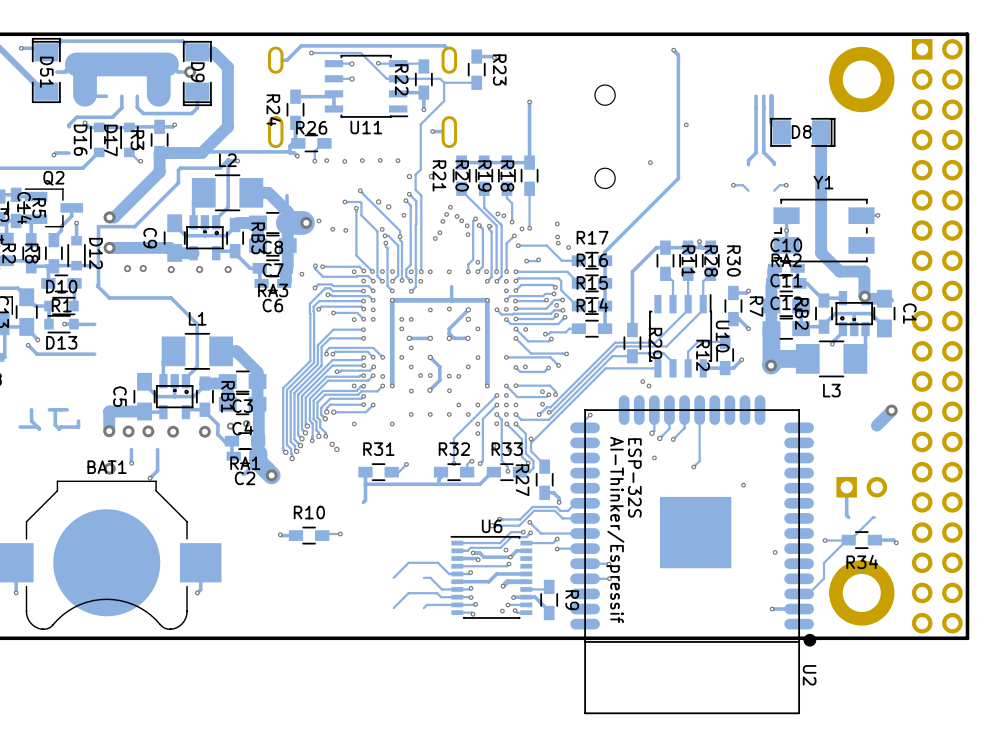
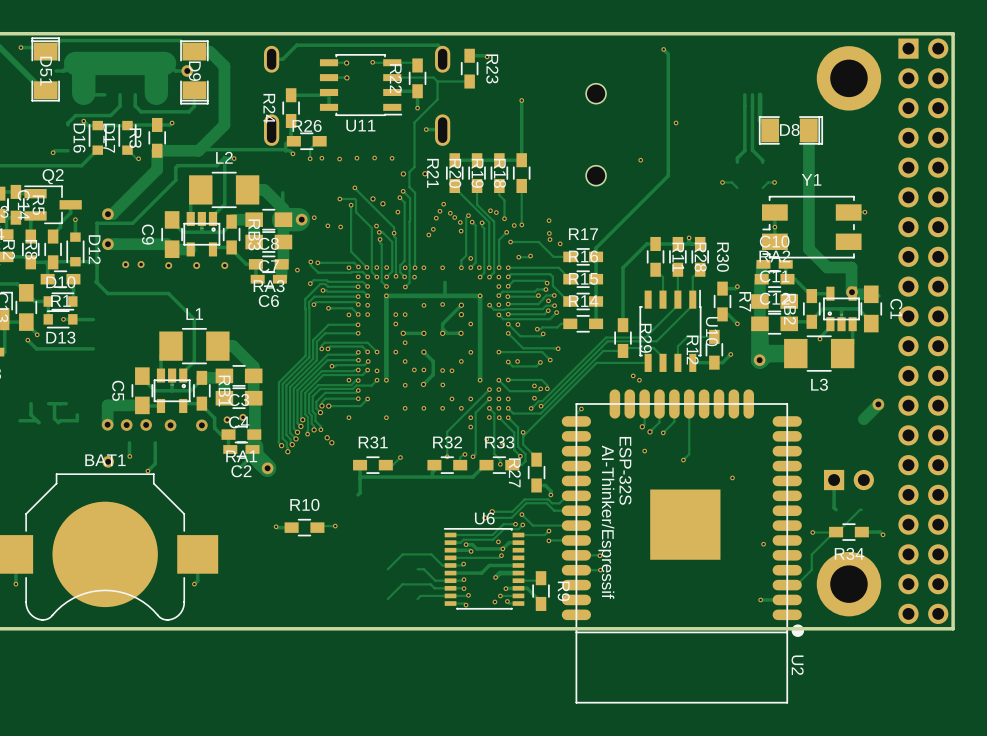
track: (311, 53) (360, 53) (386, 78) (398, 78) -> none
via: (311, 53) -> none

